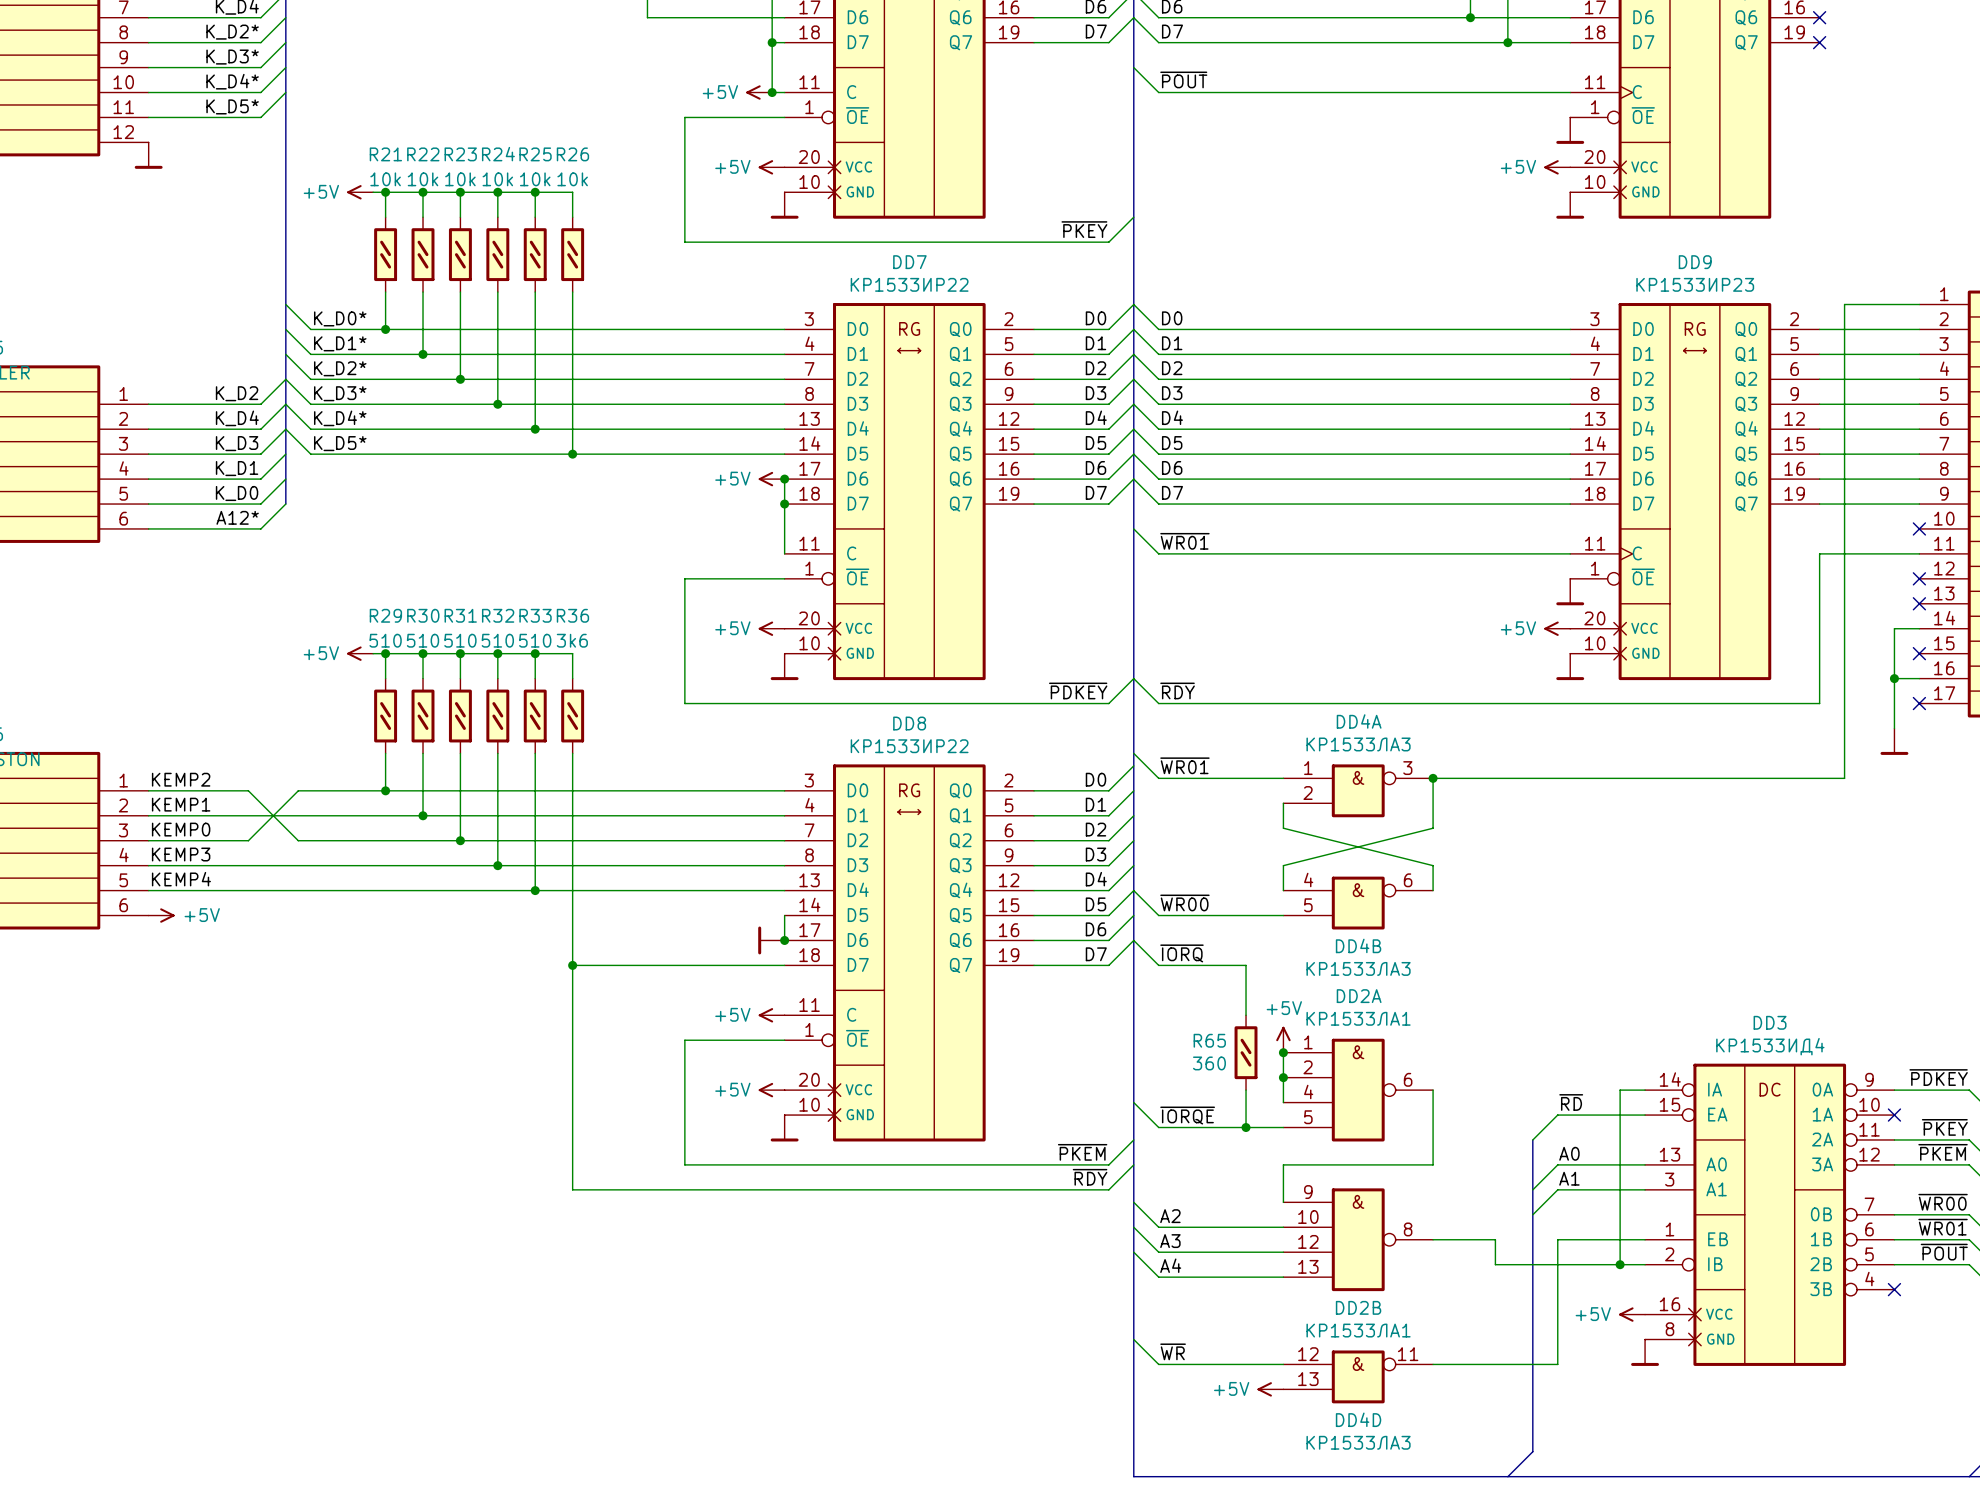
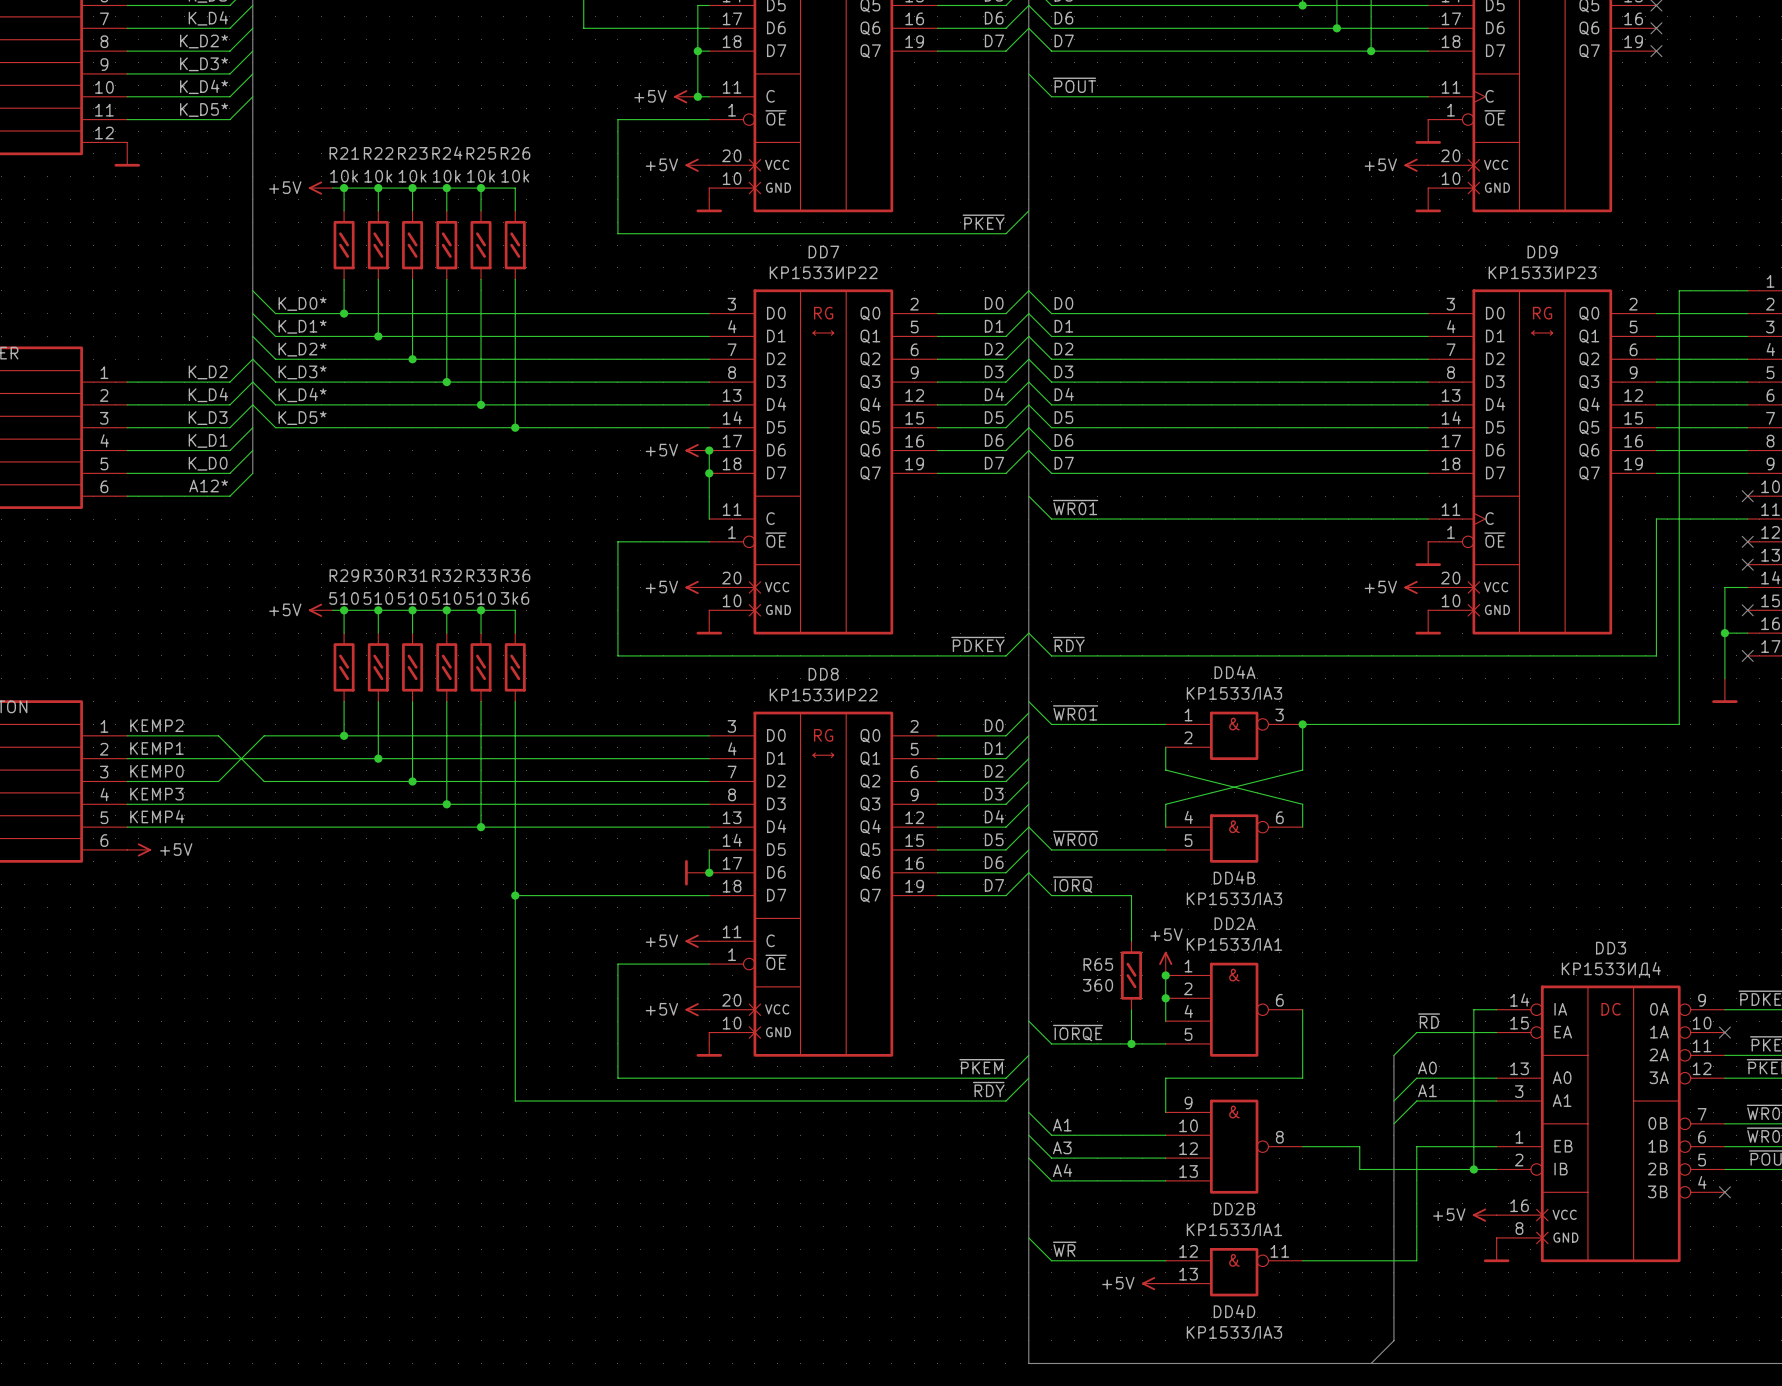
label: A2 (1170, 1216) -> A1 (1062, 1125)

